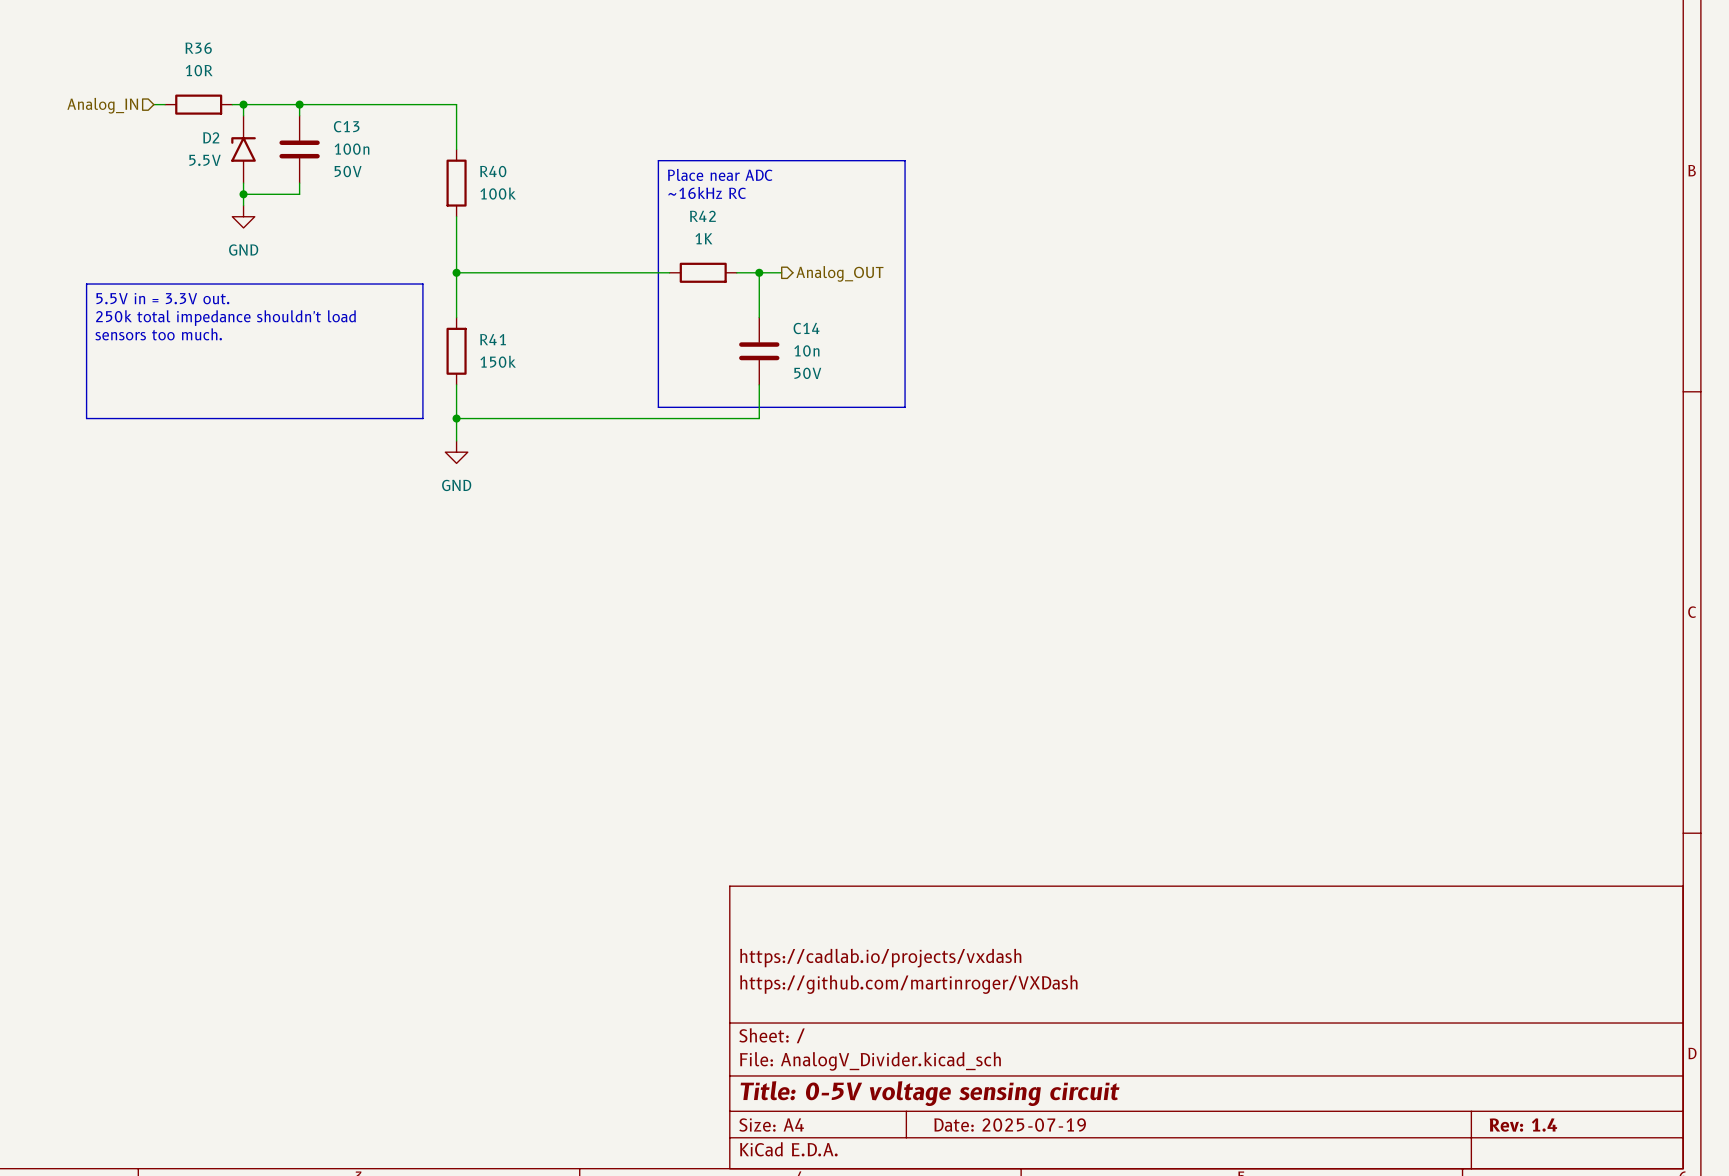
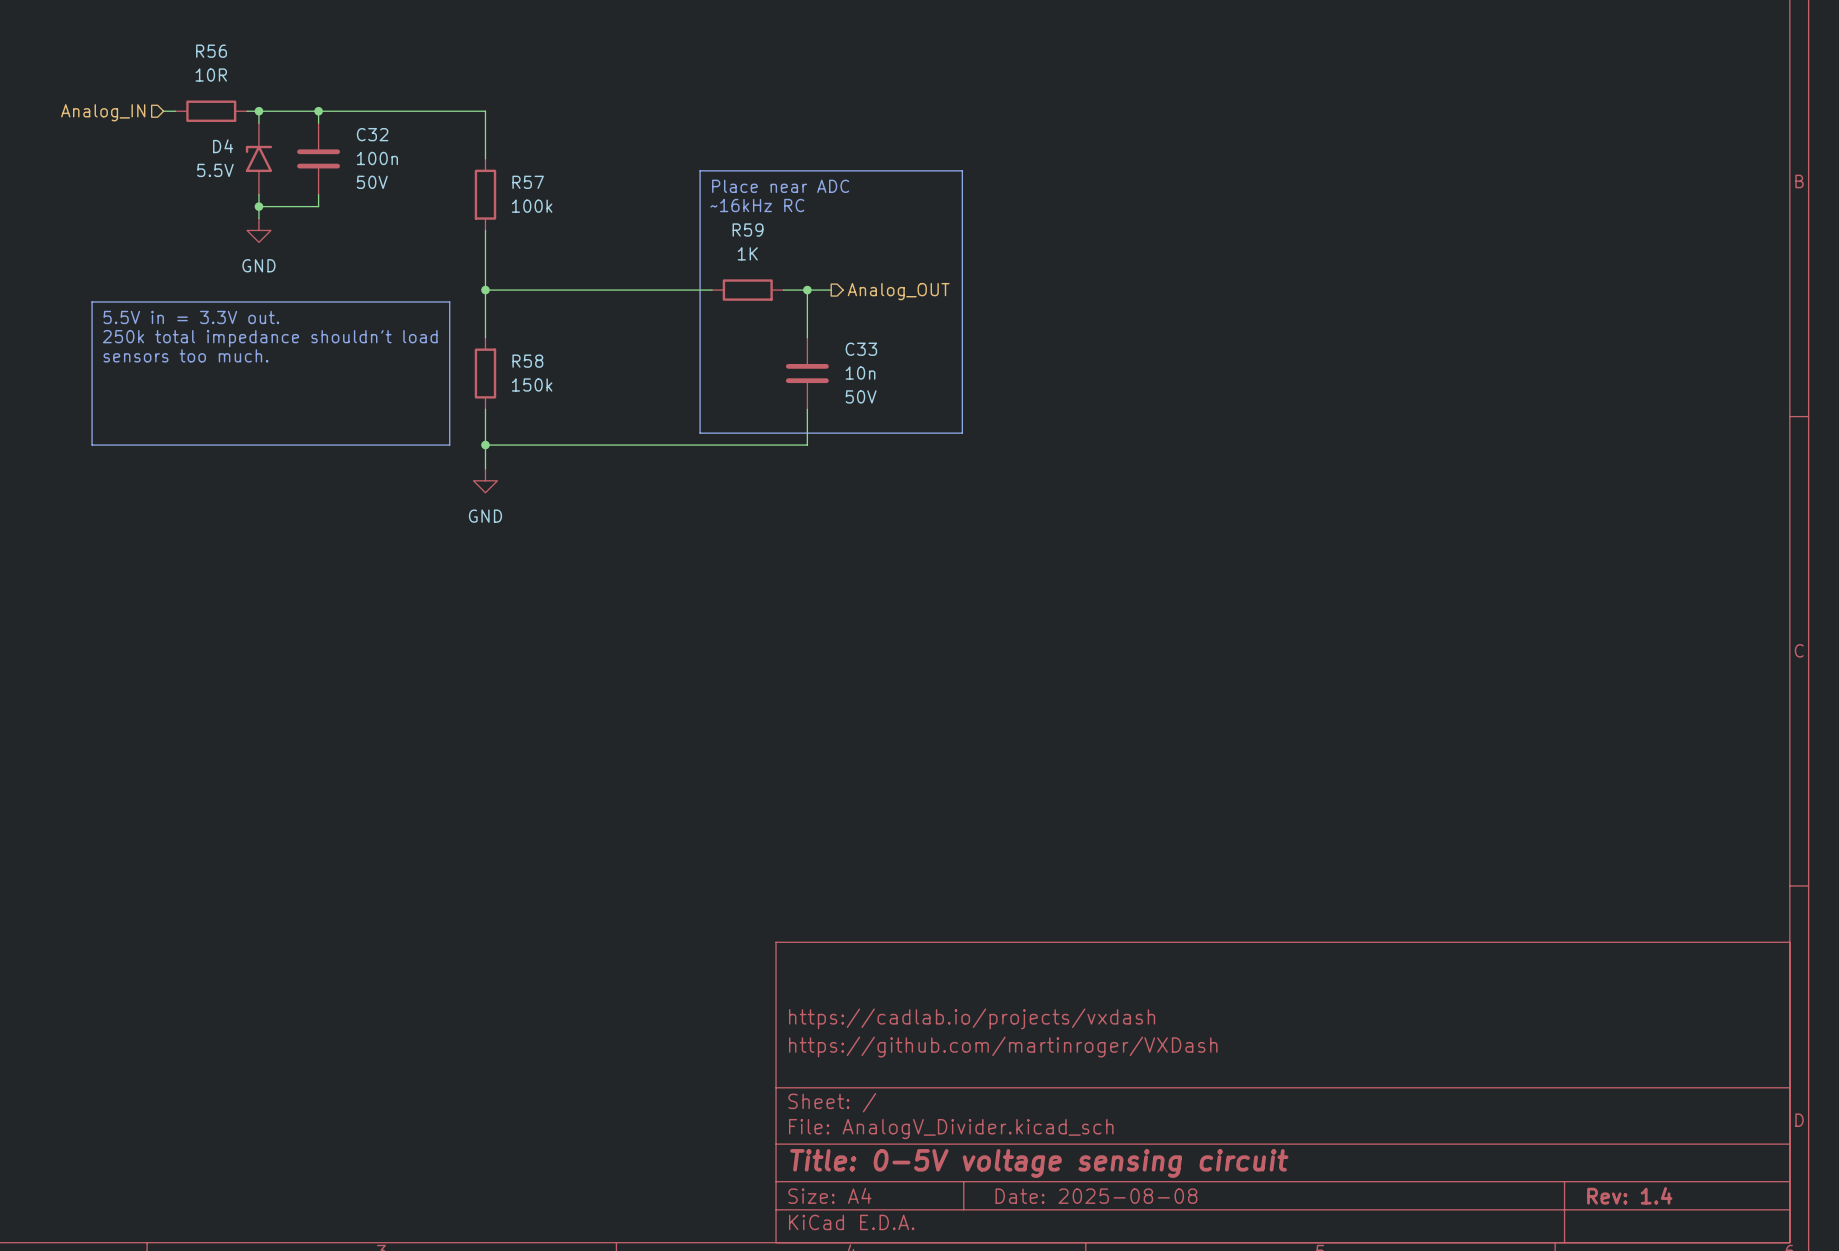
R36 name: R36 (198, 48) -> R56 (211, 51)
C13 name: C13 (346, 126) -> C32 (372, 134)
D2 name: D2 (211, 137) -> D4 (223, 146)
R40 name: R40 (493, 171) -> R57 (528, 182)
R42 name: R42 (702, 216) -> R59 (748, 230)
C14 name: C14 (806, 328) -> C33 (861, 349)
R41 name: R41 (493, 339) -> R58 (527, 361)
title block: Date: 2025-07-19 (1010, 1124) -> Date: 2025-08-08 (1096, 1196)

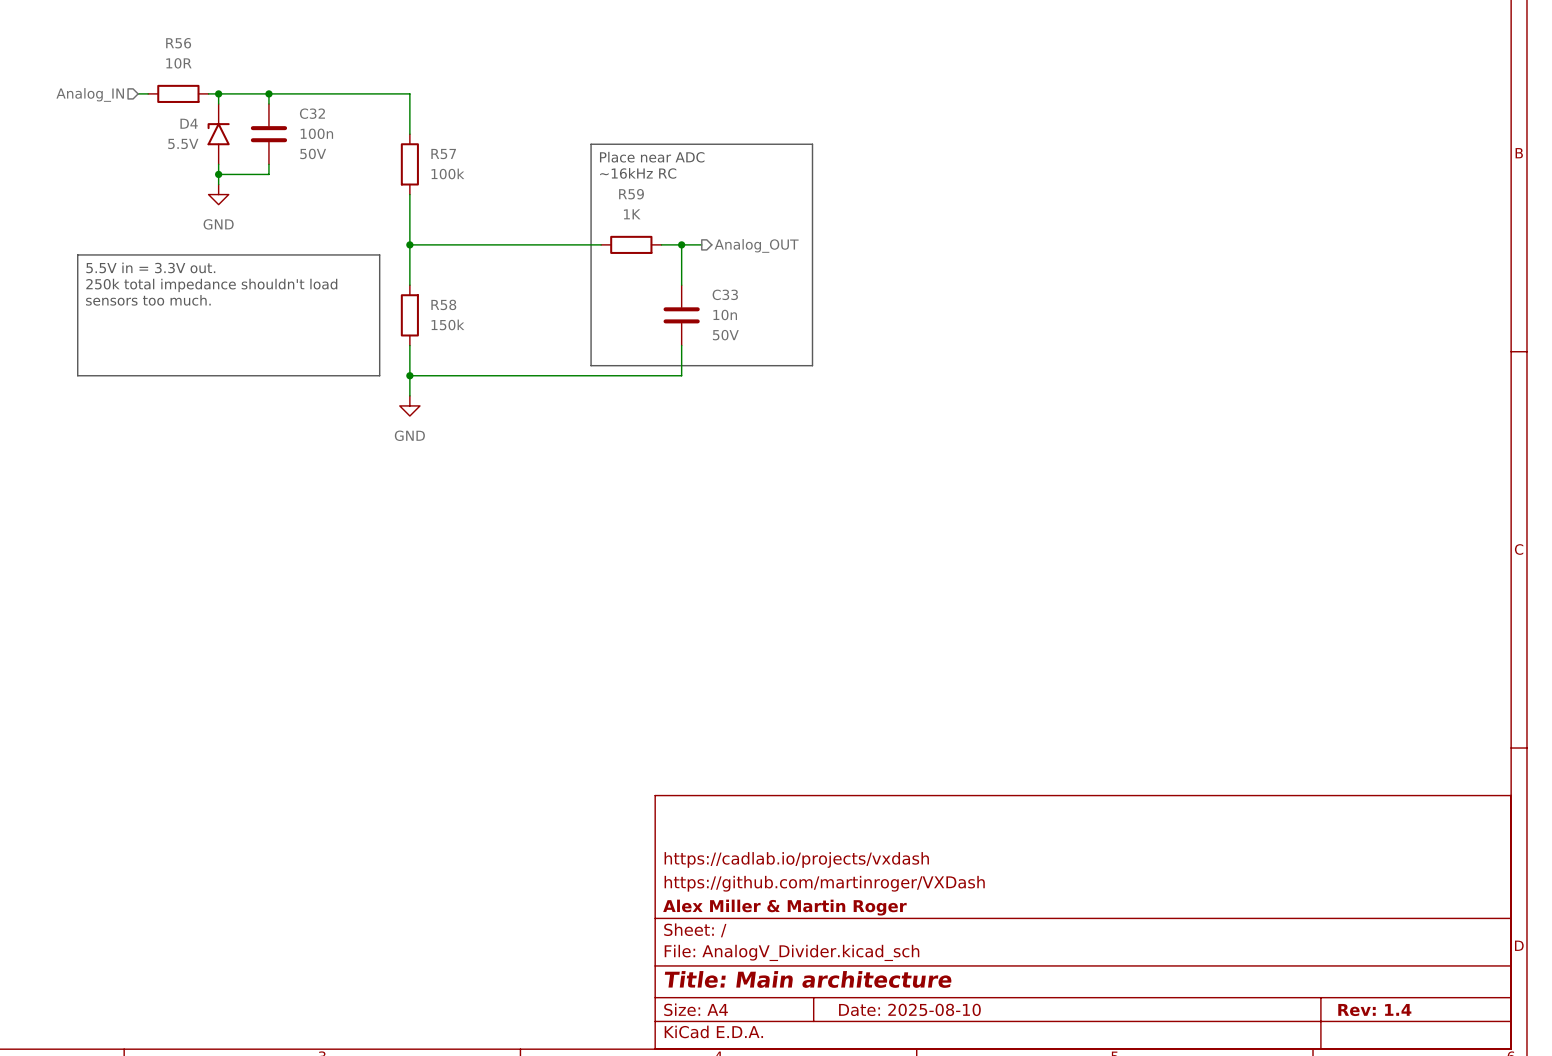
title block: none -> Alex Miller & Martin Roger (784, 907)
title block: Title: 0-5V voltage sensing circuit (1039, 1163) -> Title: Main architecture (808, 979)
title block: Date: 2025-08-08 (1096, 1196) -> Date: 2025-08-10 (909, 1009)

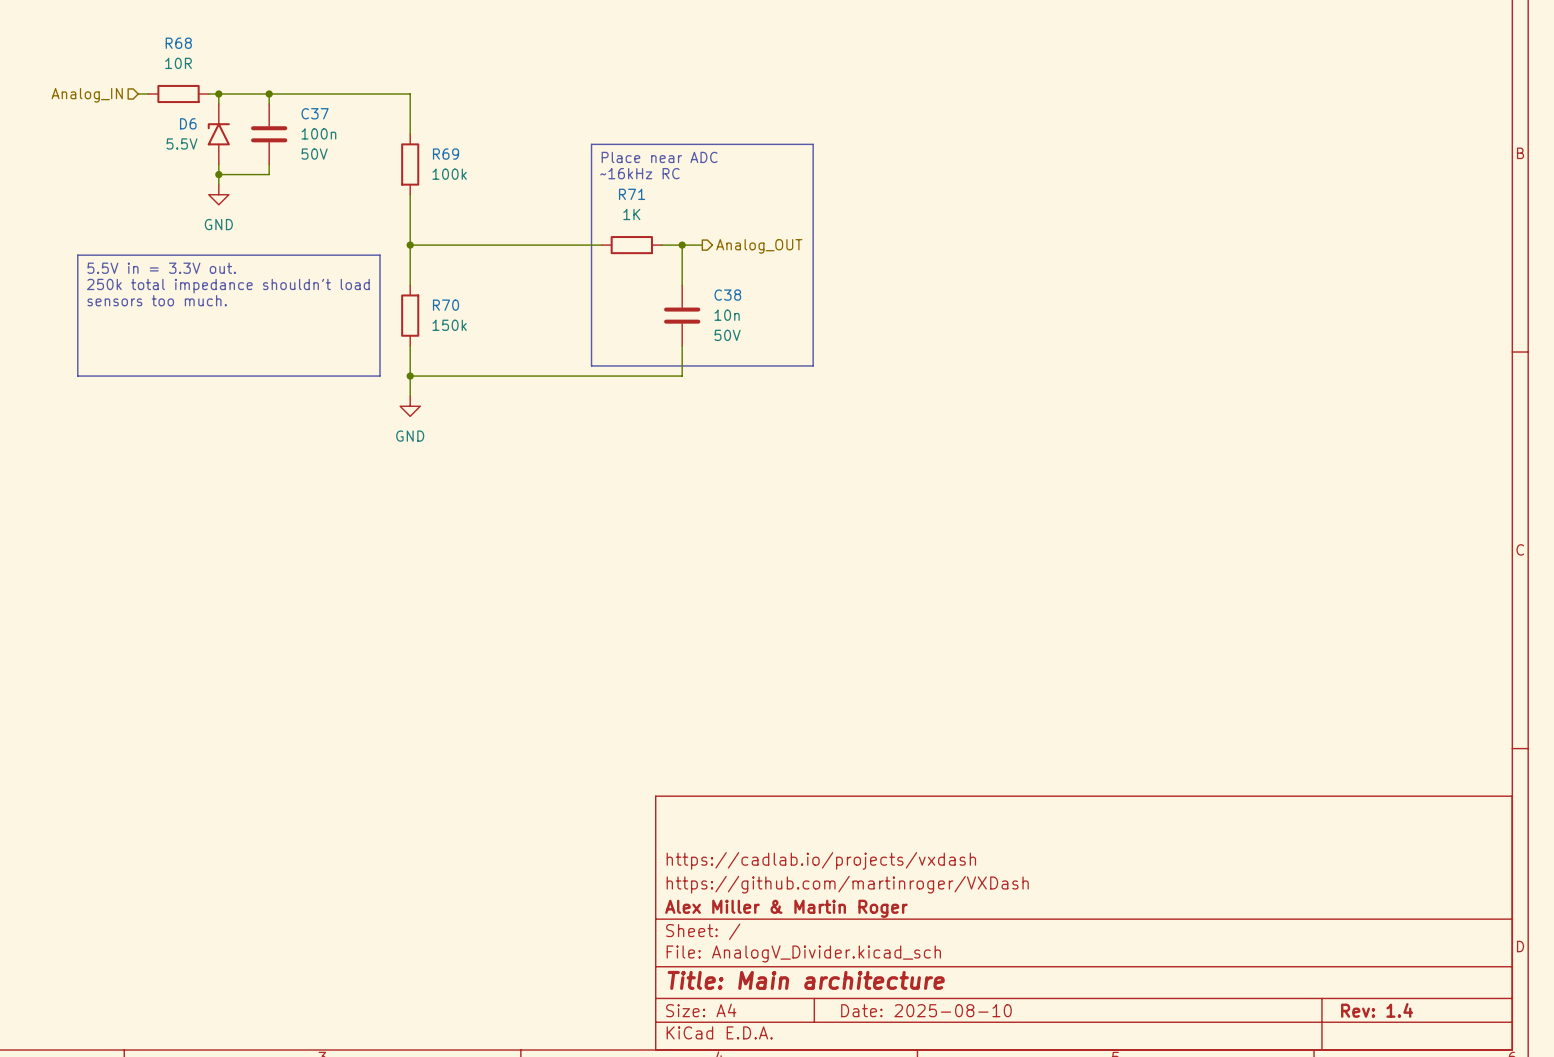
R56 name: R56 (178, 43) -> R68 (178, 43)
C32 name: C32 (312, 113) -> C37 (315, 113)
D4 name: D4 (189, 123) -> D6 (188, 123)
R57 name: R57 (443, 154) -> R69 (446, 154)
R59 name: R59 (631, 194) -> R71 (632, 194)
C33 name: C33 (725, 294) -> C38 (727, 295)
R58 name: R58 (443, 304) -> R70 (446, 305)

